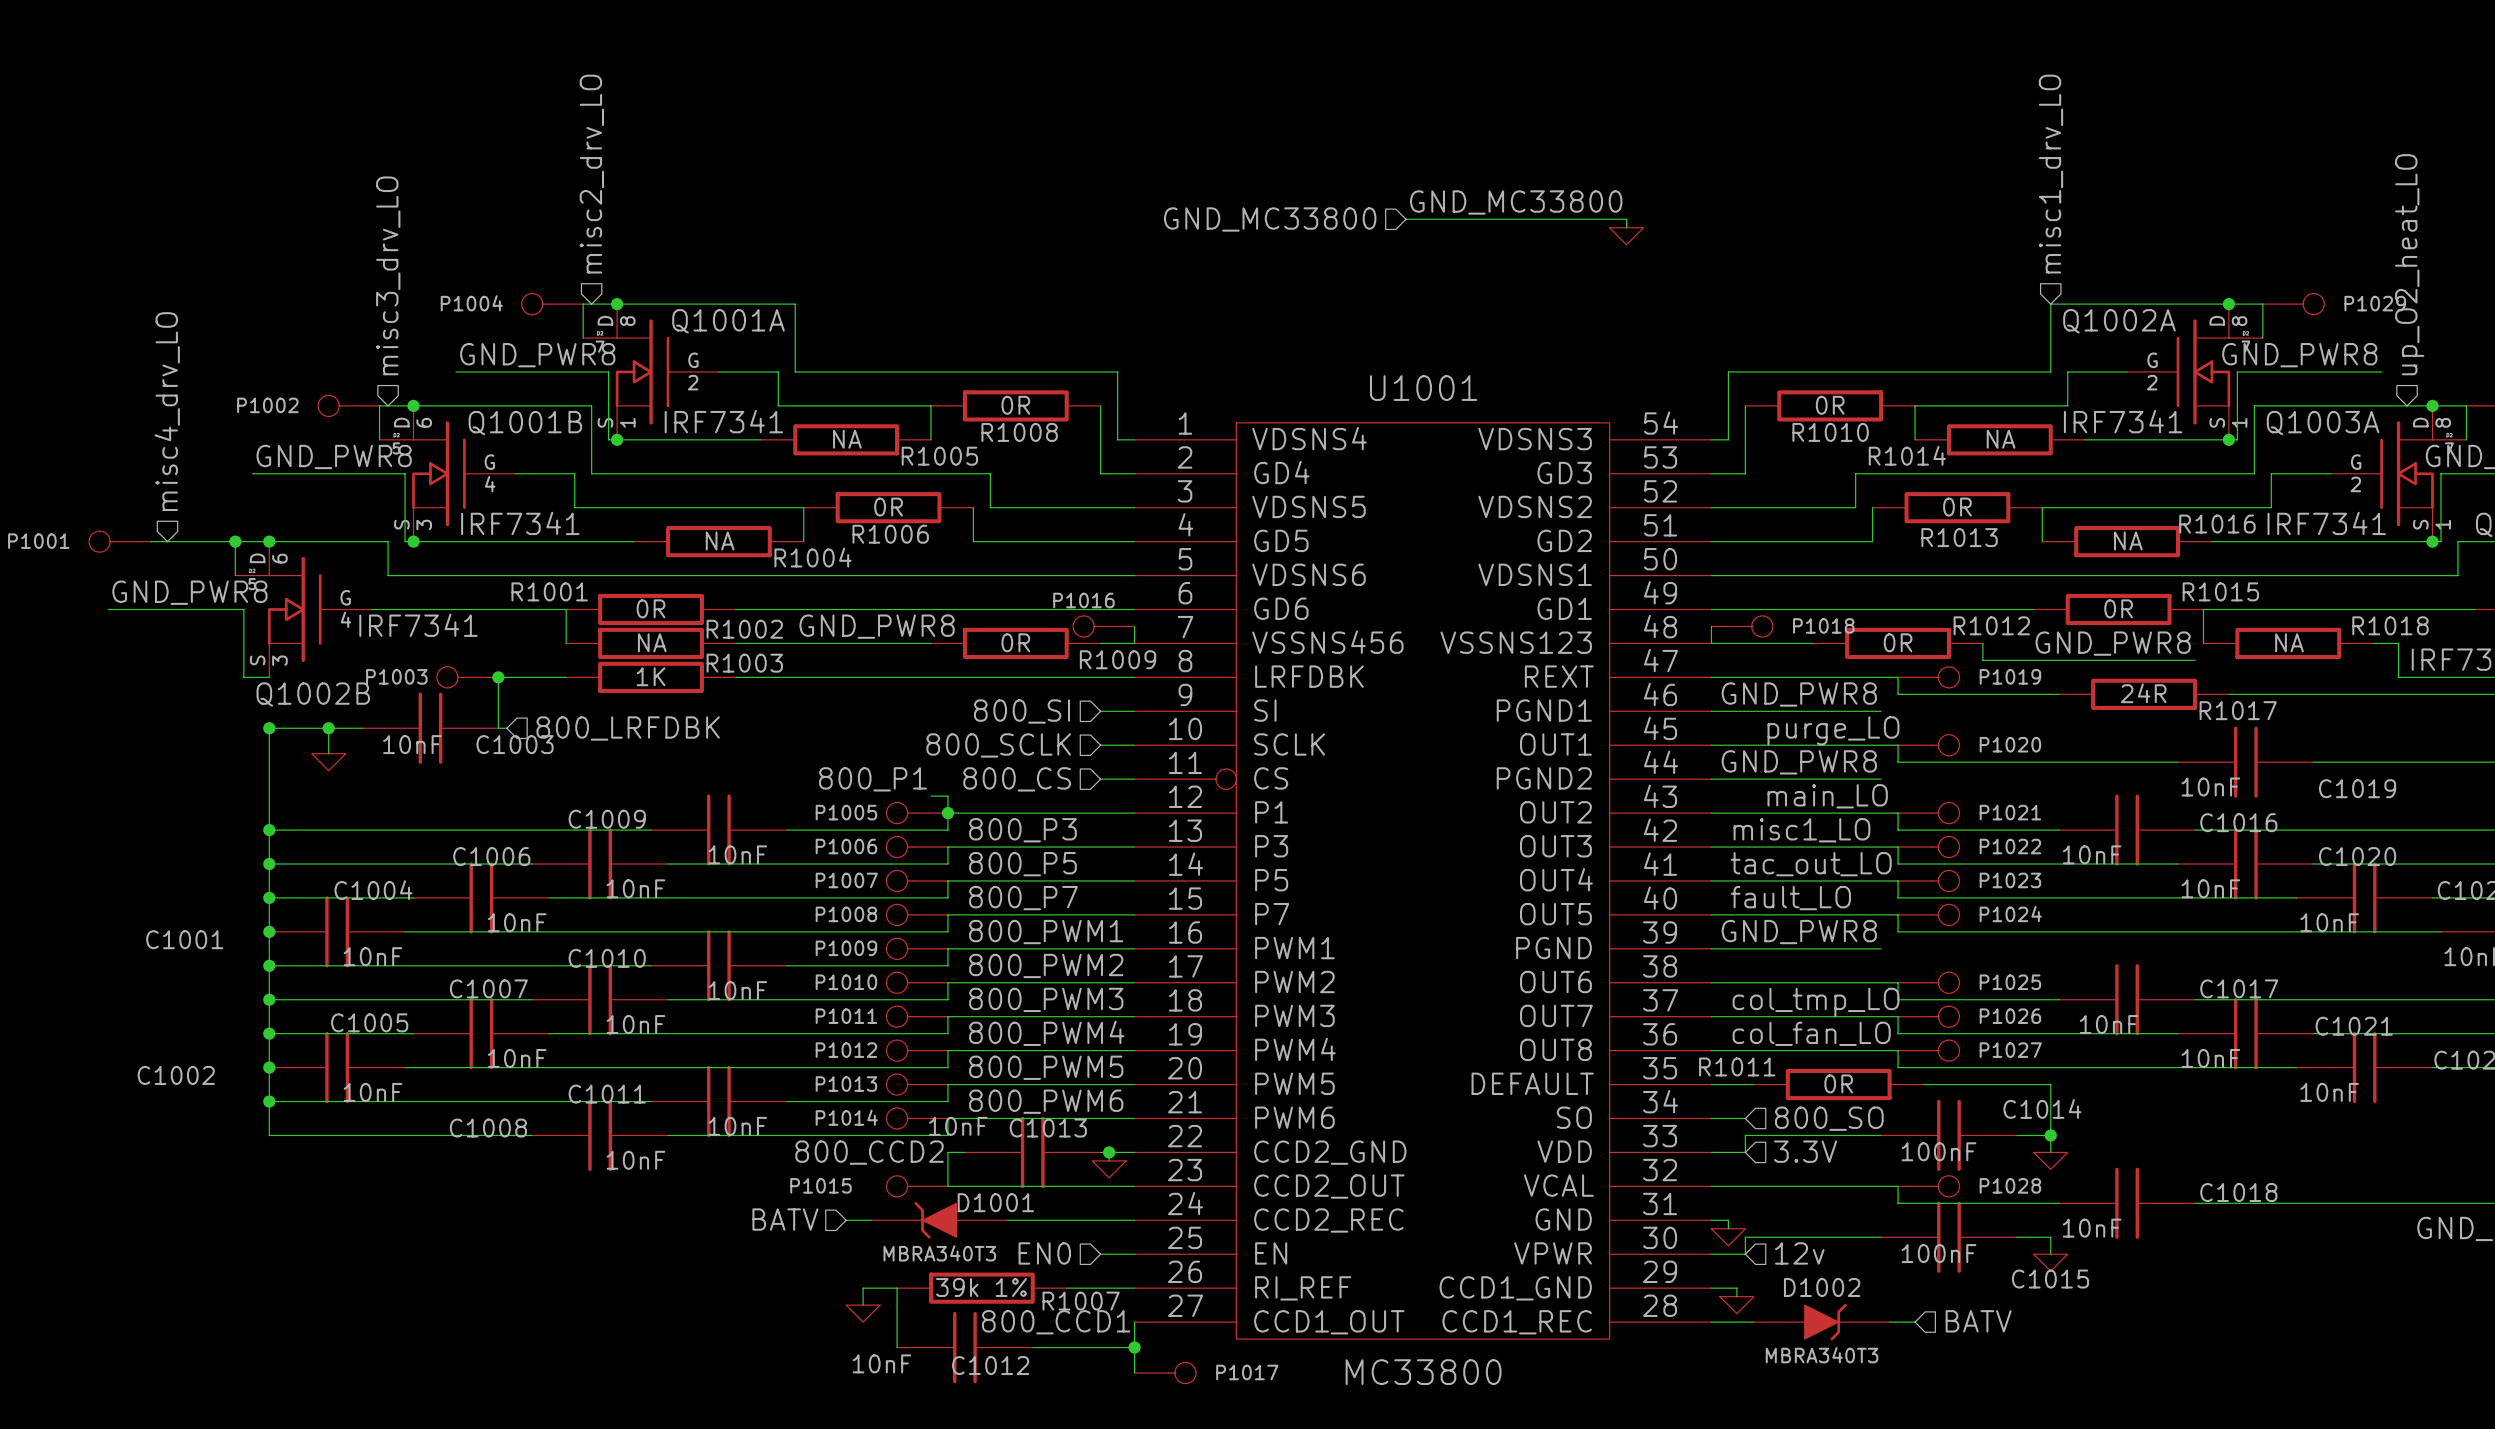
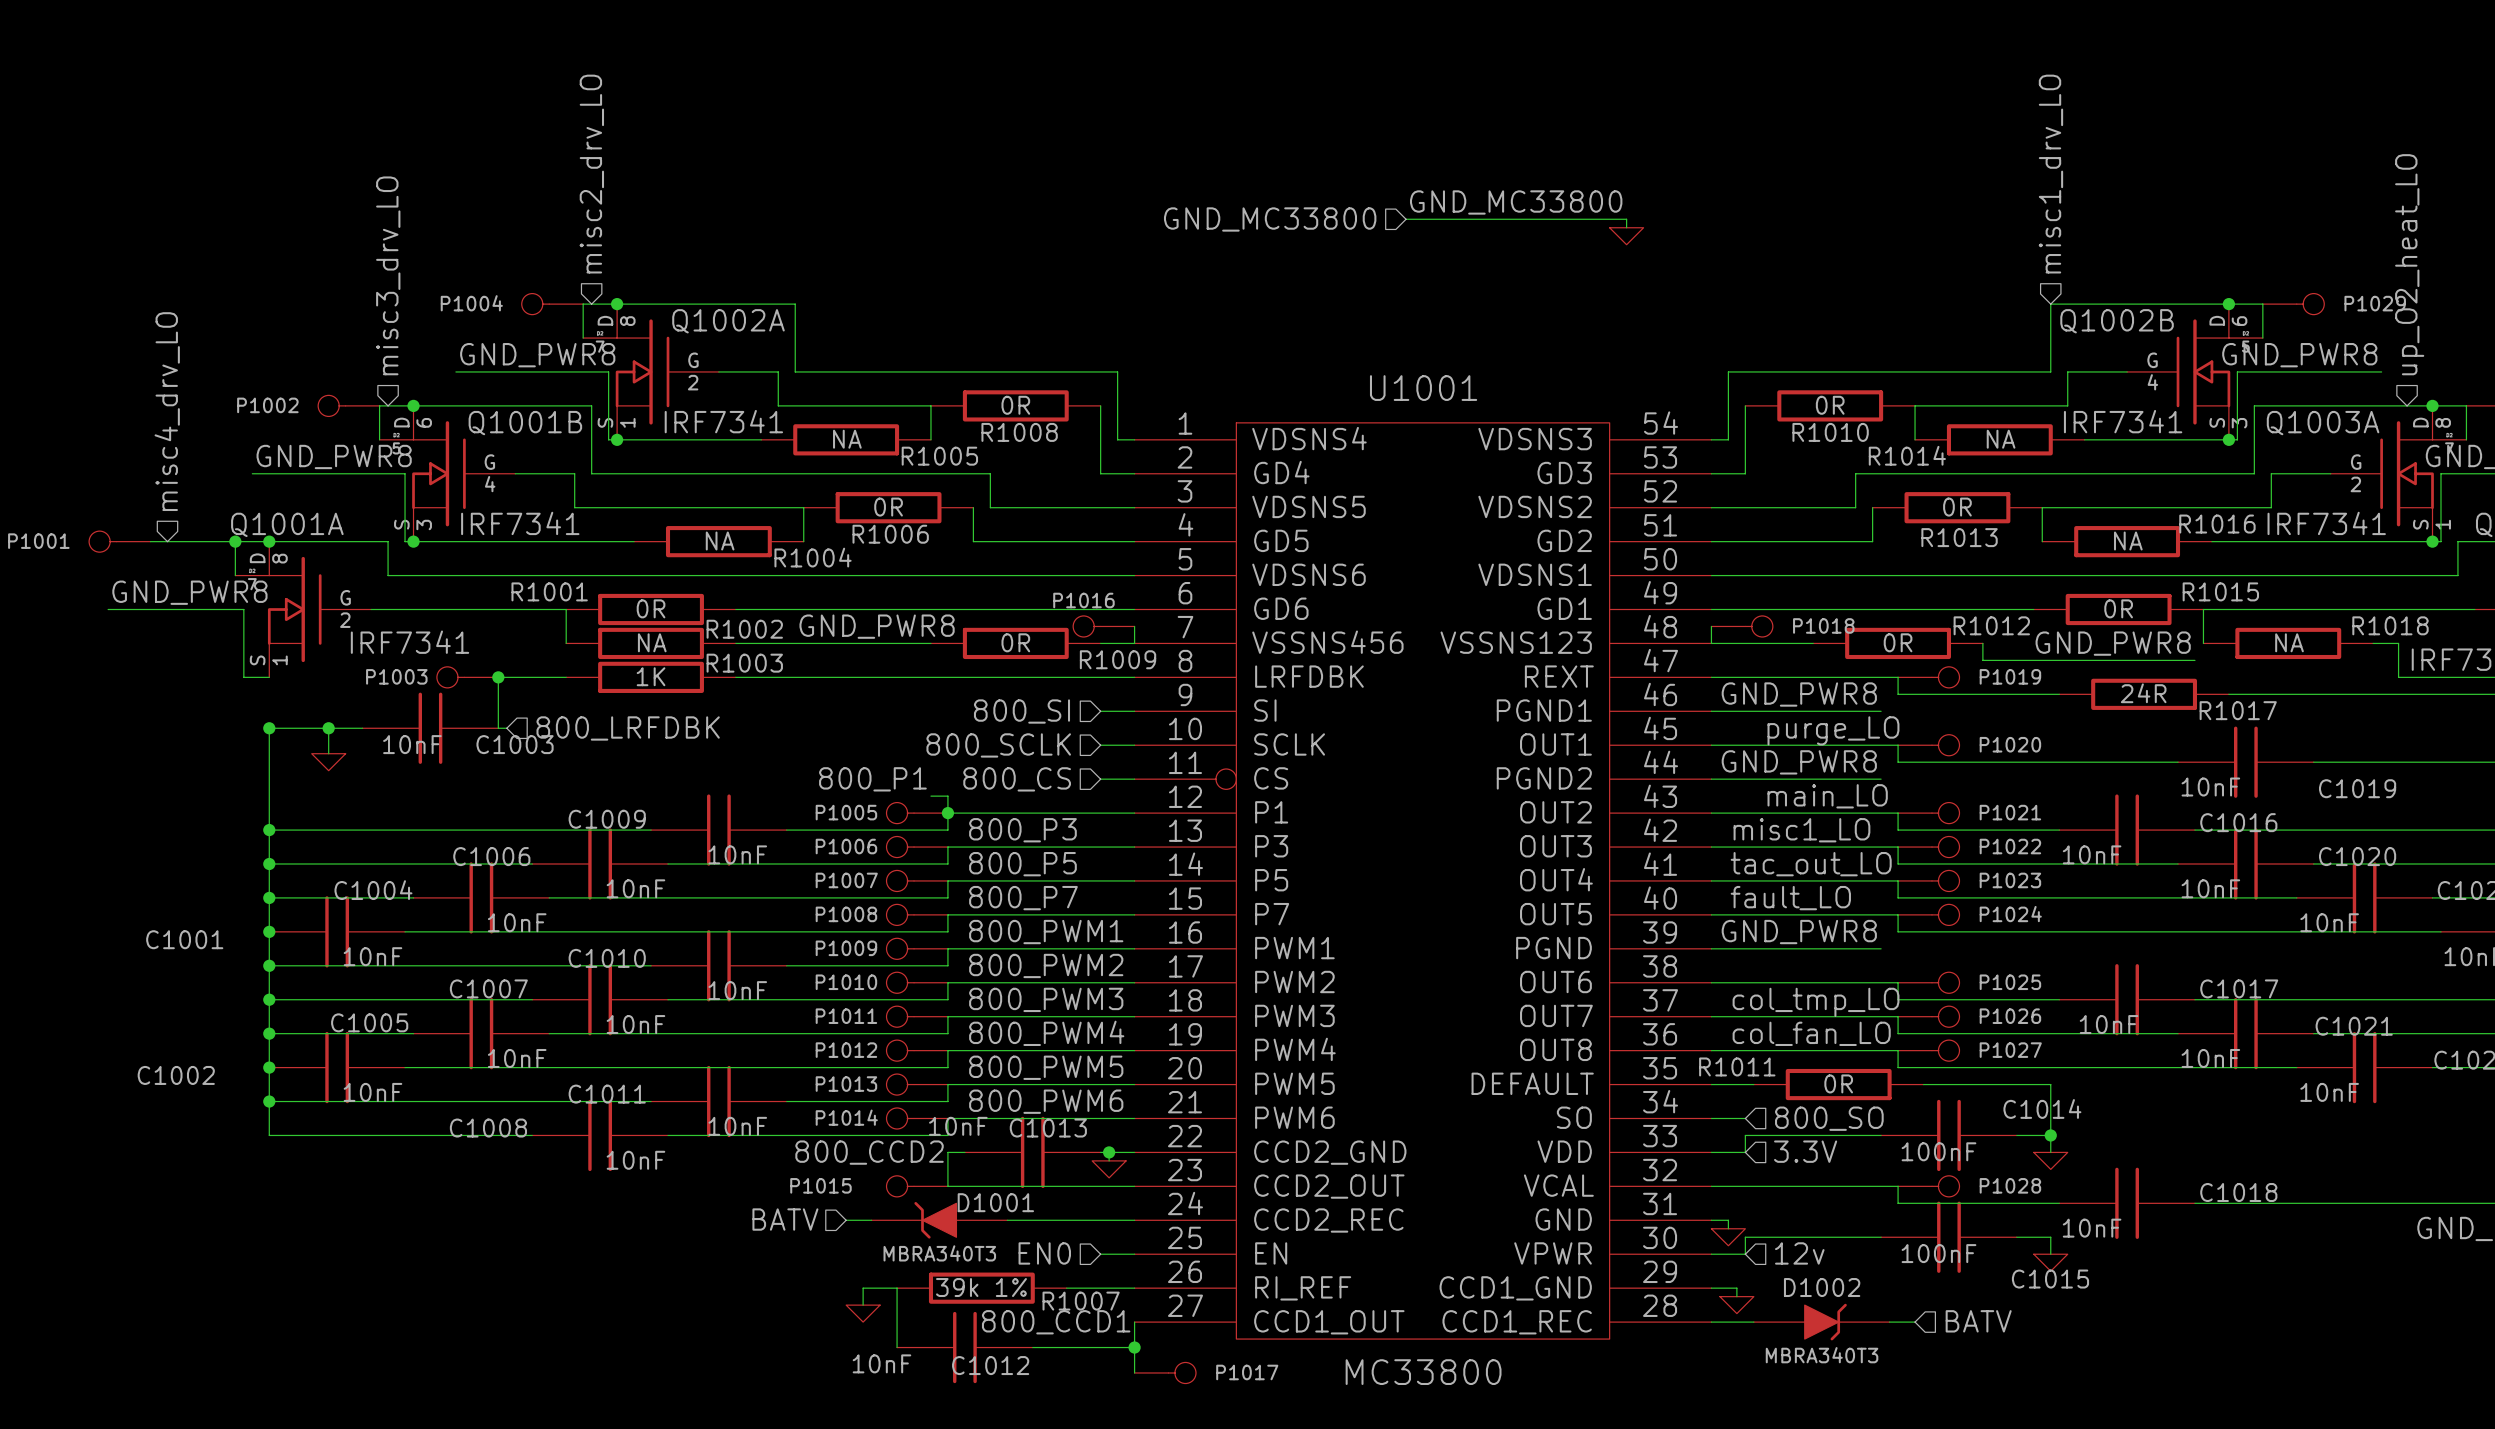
Q1001A name: Q1001A (728, 321) -> Q1002A (728, 321)
Q1002A: IRF7341 (2194, 371) -> none
Q1002B flip: as is (294, 609) -> left-right (2203, 371)
Q1002B position: (303, 609) -> (2194, 371)
Q1001A: none -> IRF7341 (303, 609)
Q1002B value position: IRF7341 (418, 625) -> IRF7341 (2123, 421)
Q1002B name position: Q1002B (313, 694) -> Q1002B (2117, 321)

